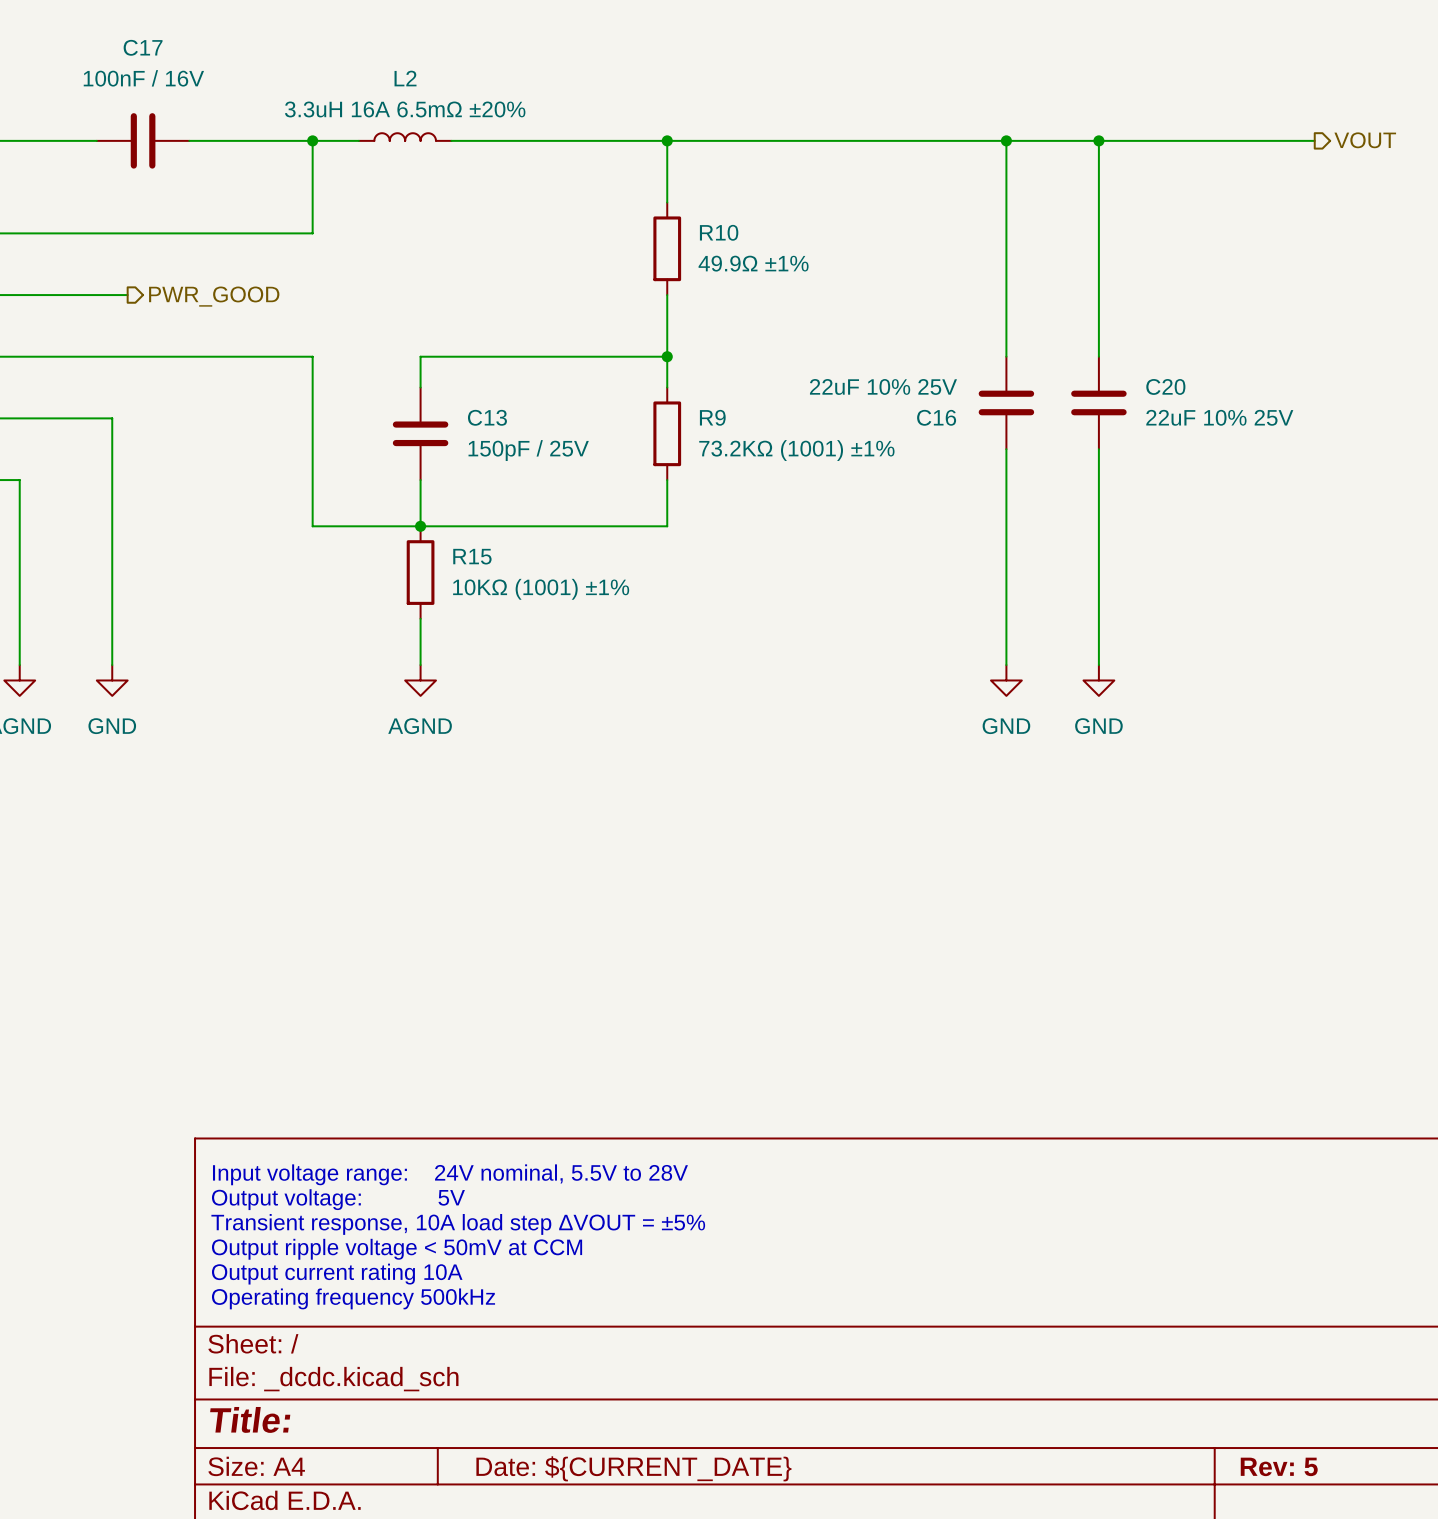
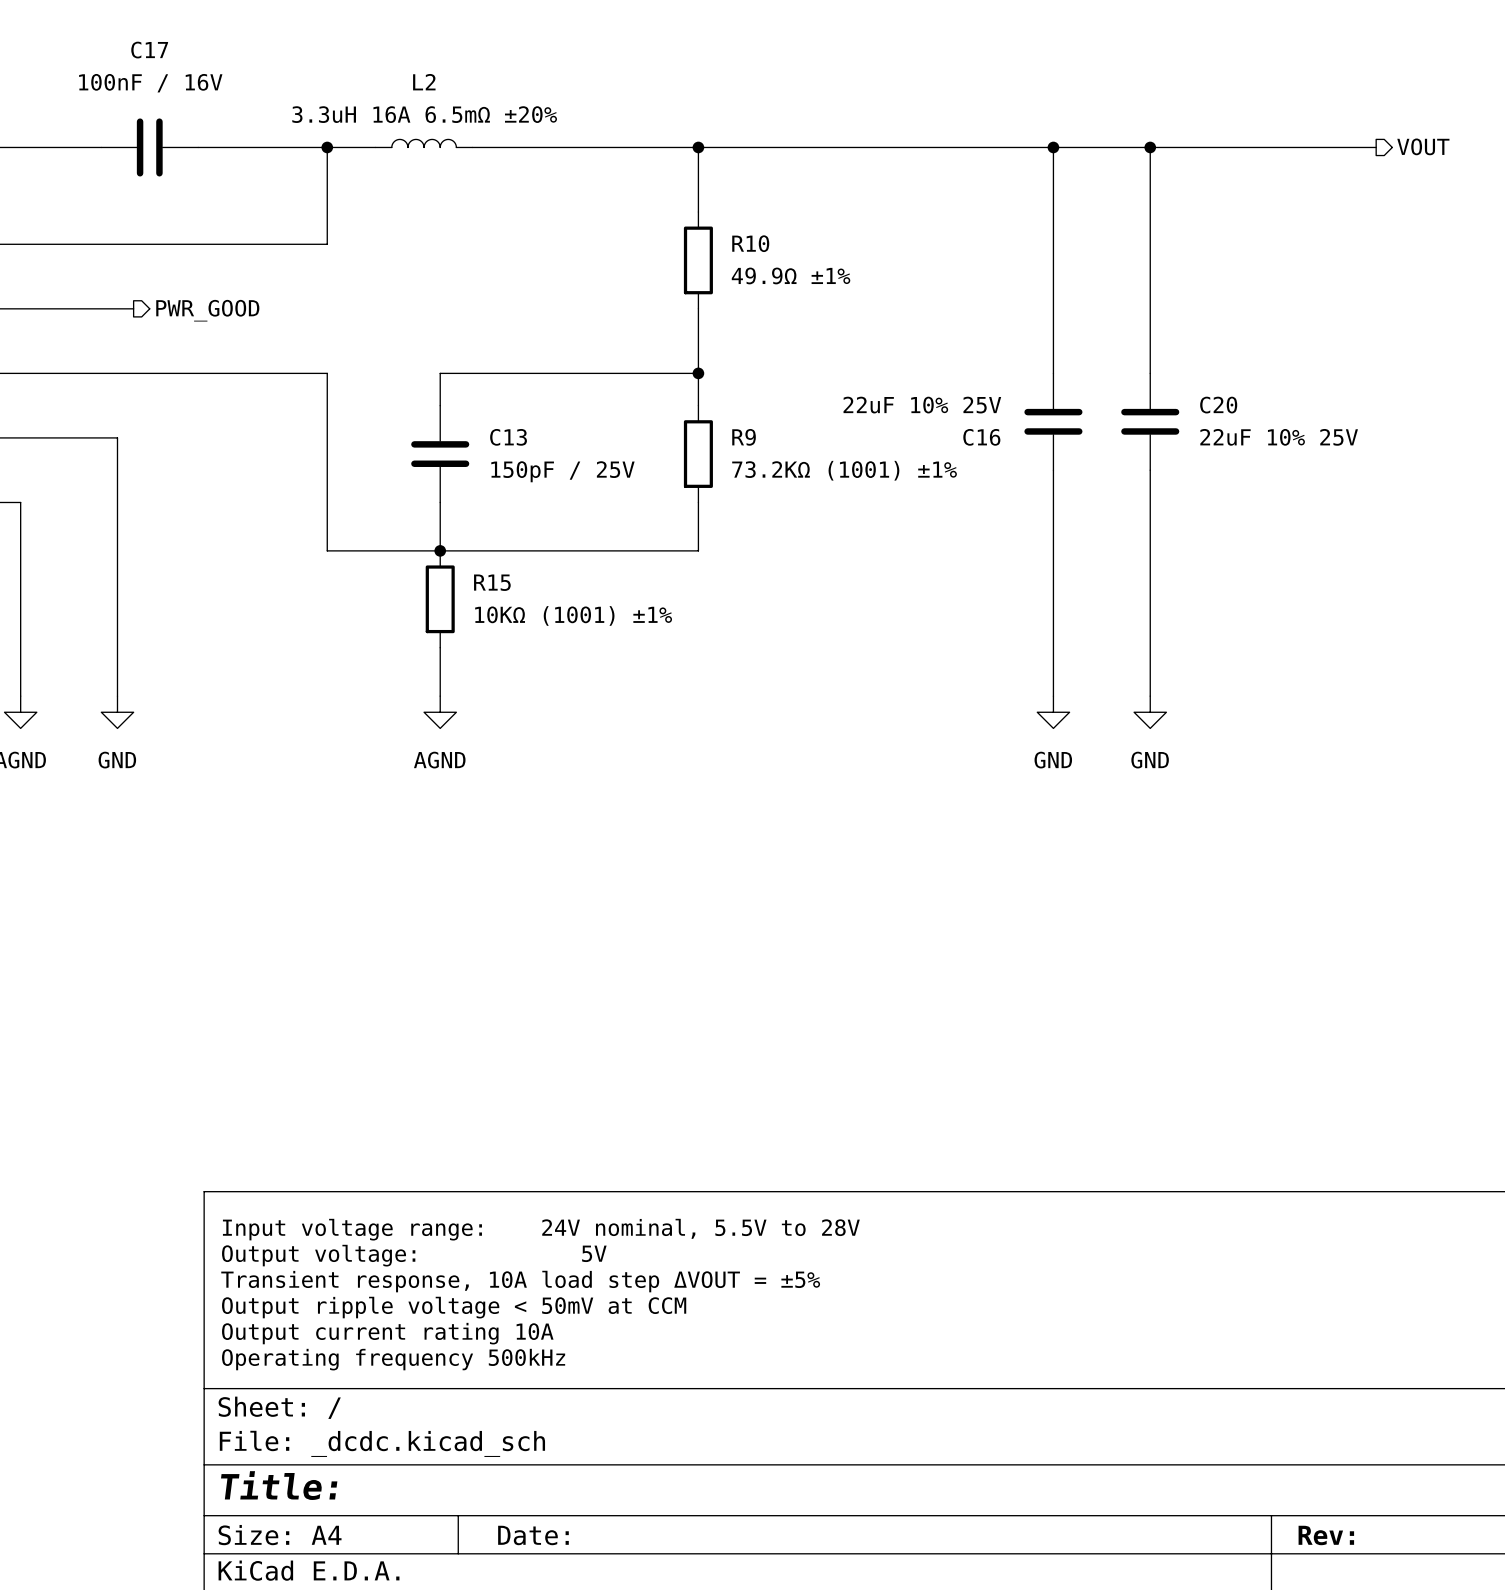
title block: Rev: 5 (1279, 1466) -> Rev: (1326, 1535)
title block: Date: ${CURRENT_DATE} (633, 1468) -> Date: (533, 1535)

